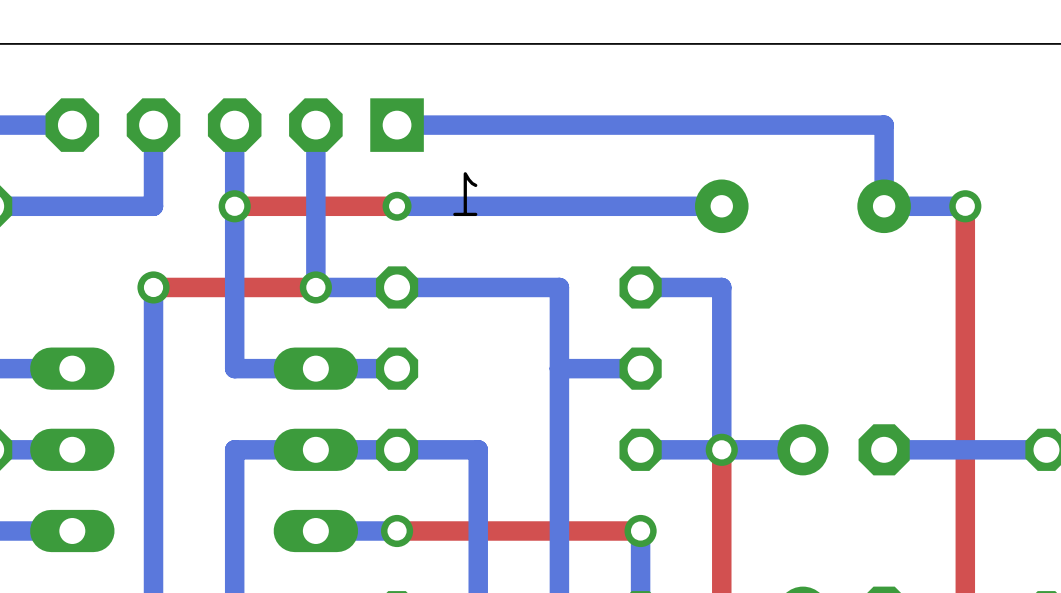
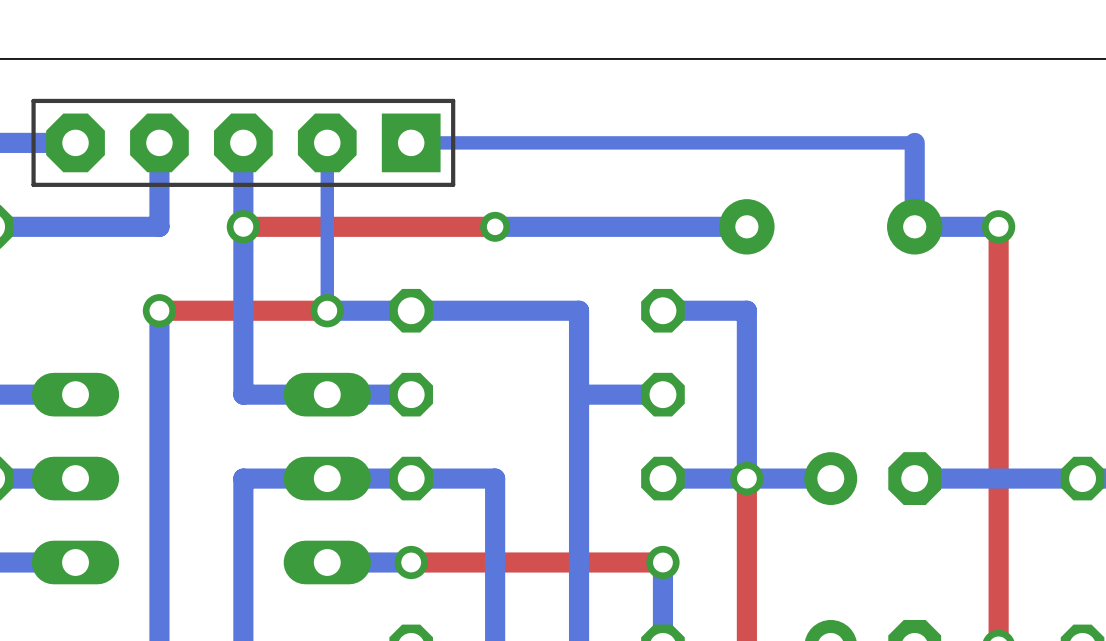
part footprint: [45, 98, 424, 152] -> [31, 98, 456, 187]
bottom track width: thick (315, 125) (315, 287) -> thin (327, 142) (327, 310)
bottom track width: thick (884, 125) (397, 125) -> thin (914, 142) (411, 142)
via position: (397, 206) -> (495, 226)
bottom track: (478, 206) (397, 206) -> none
top track: none -> (495, 226) (411, 226)

